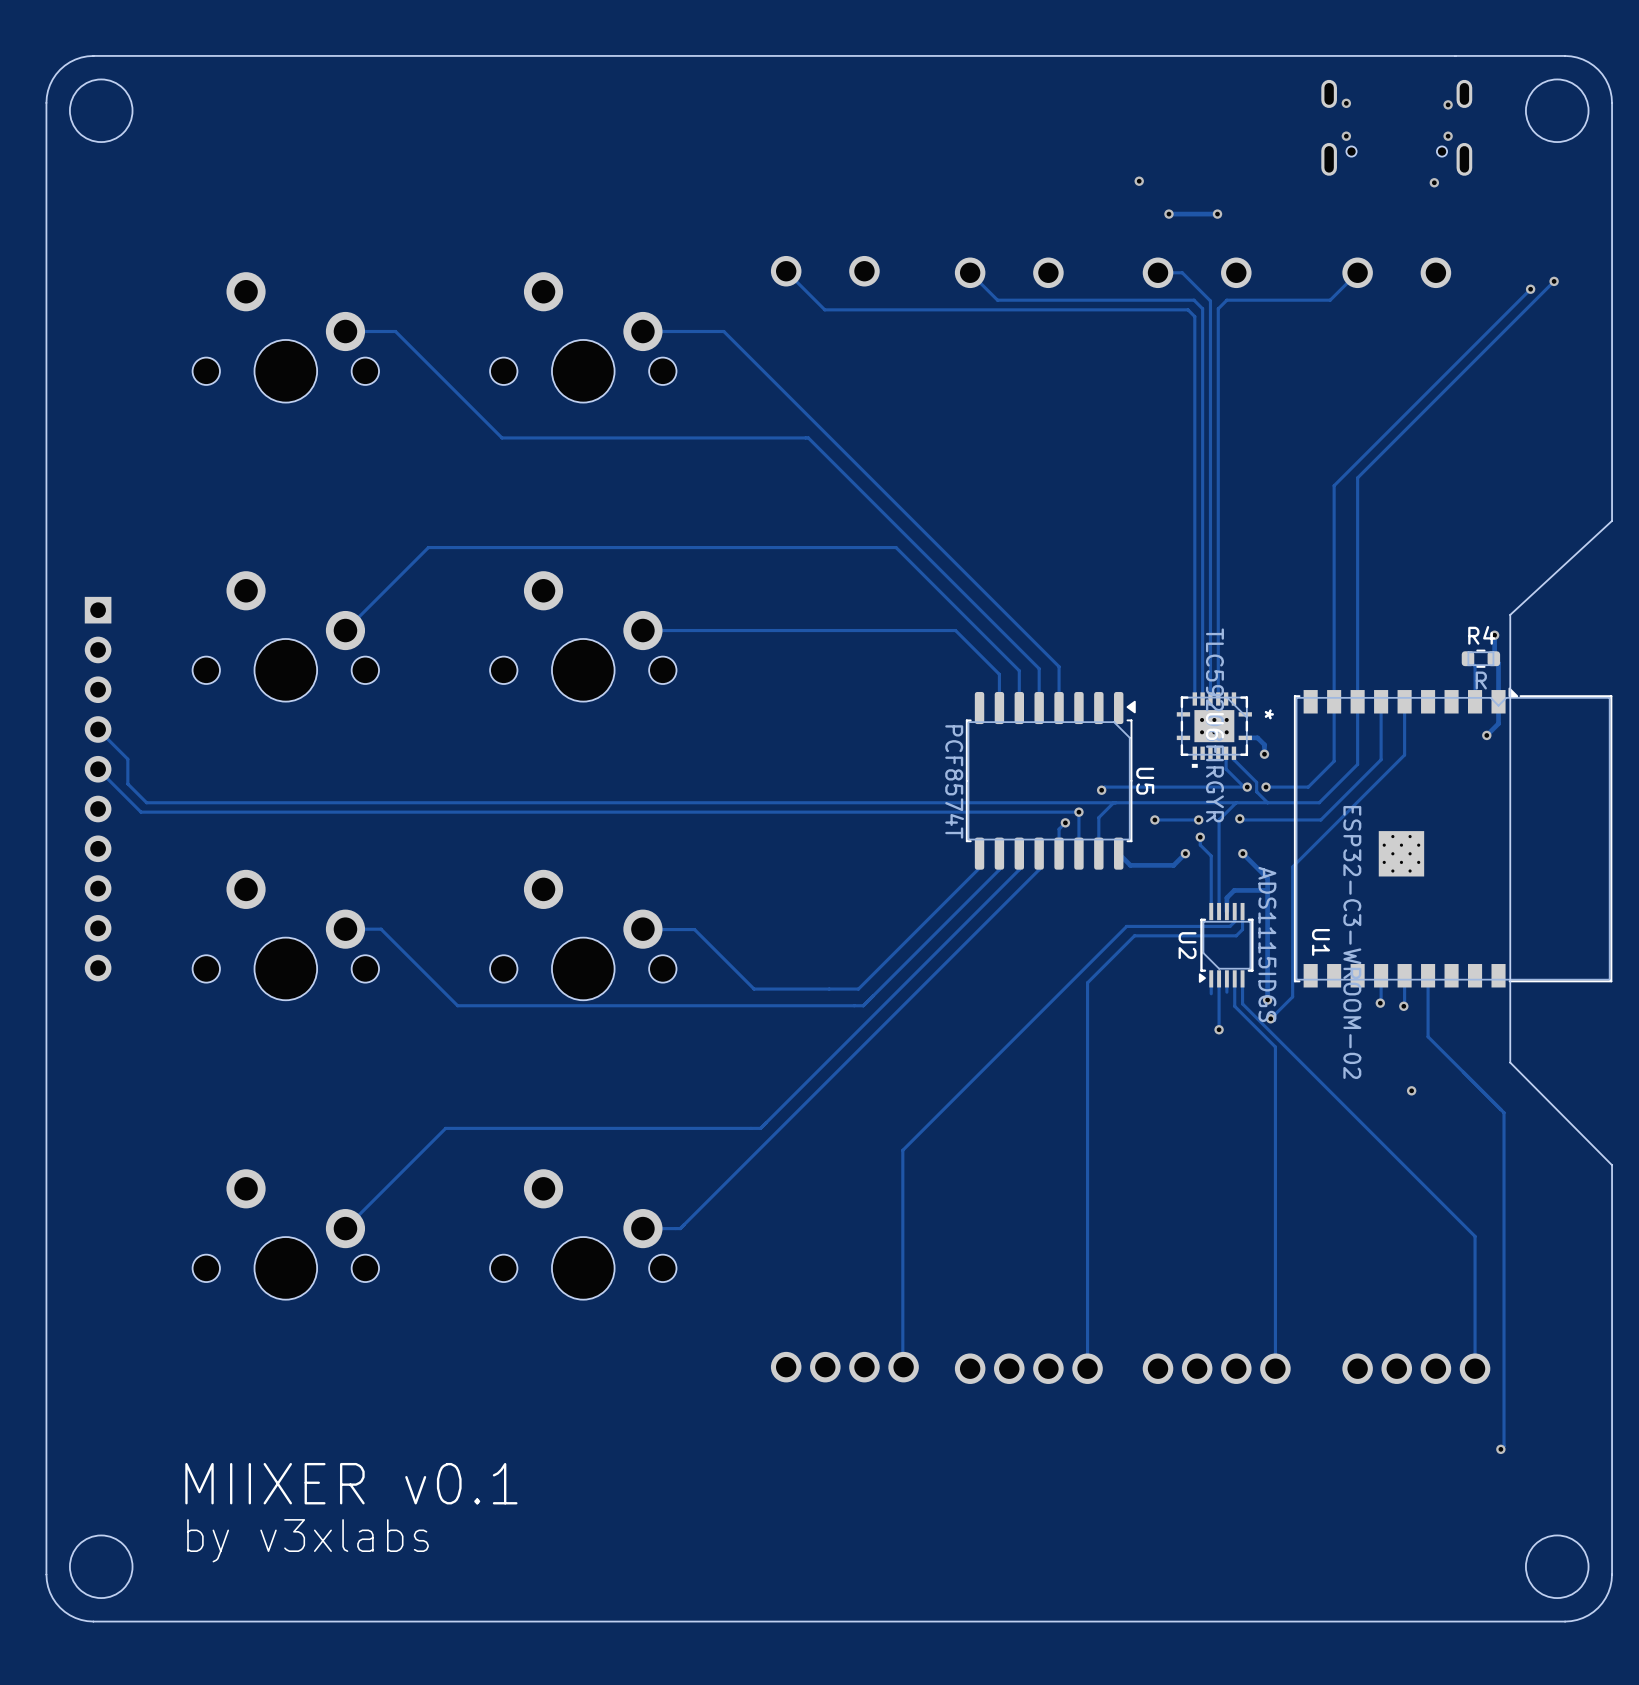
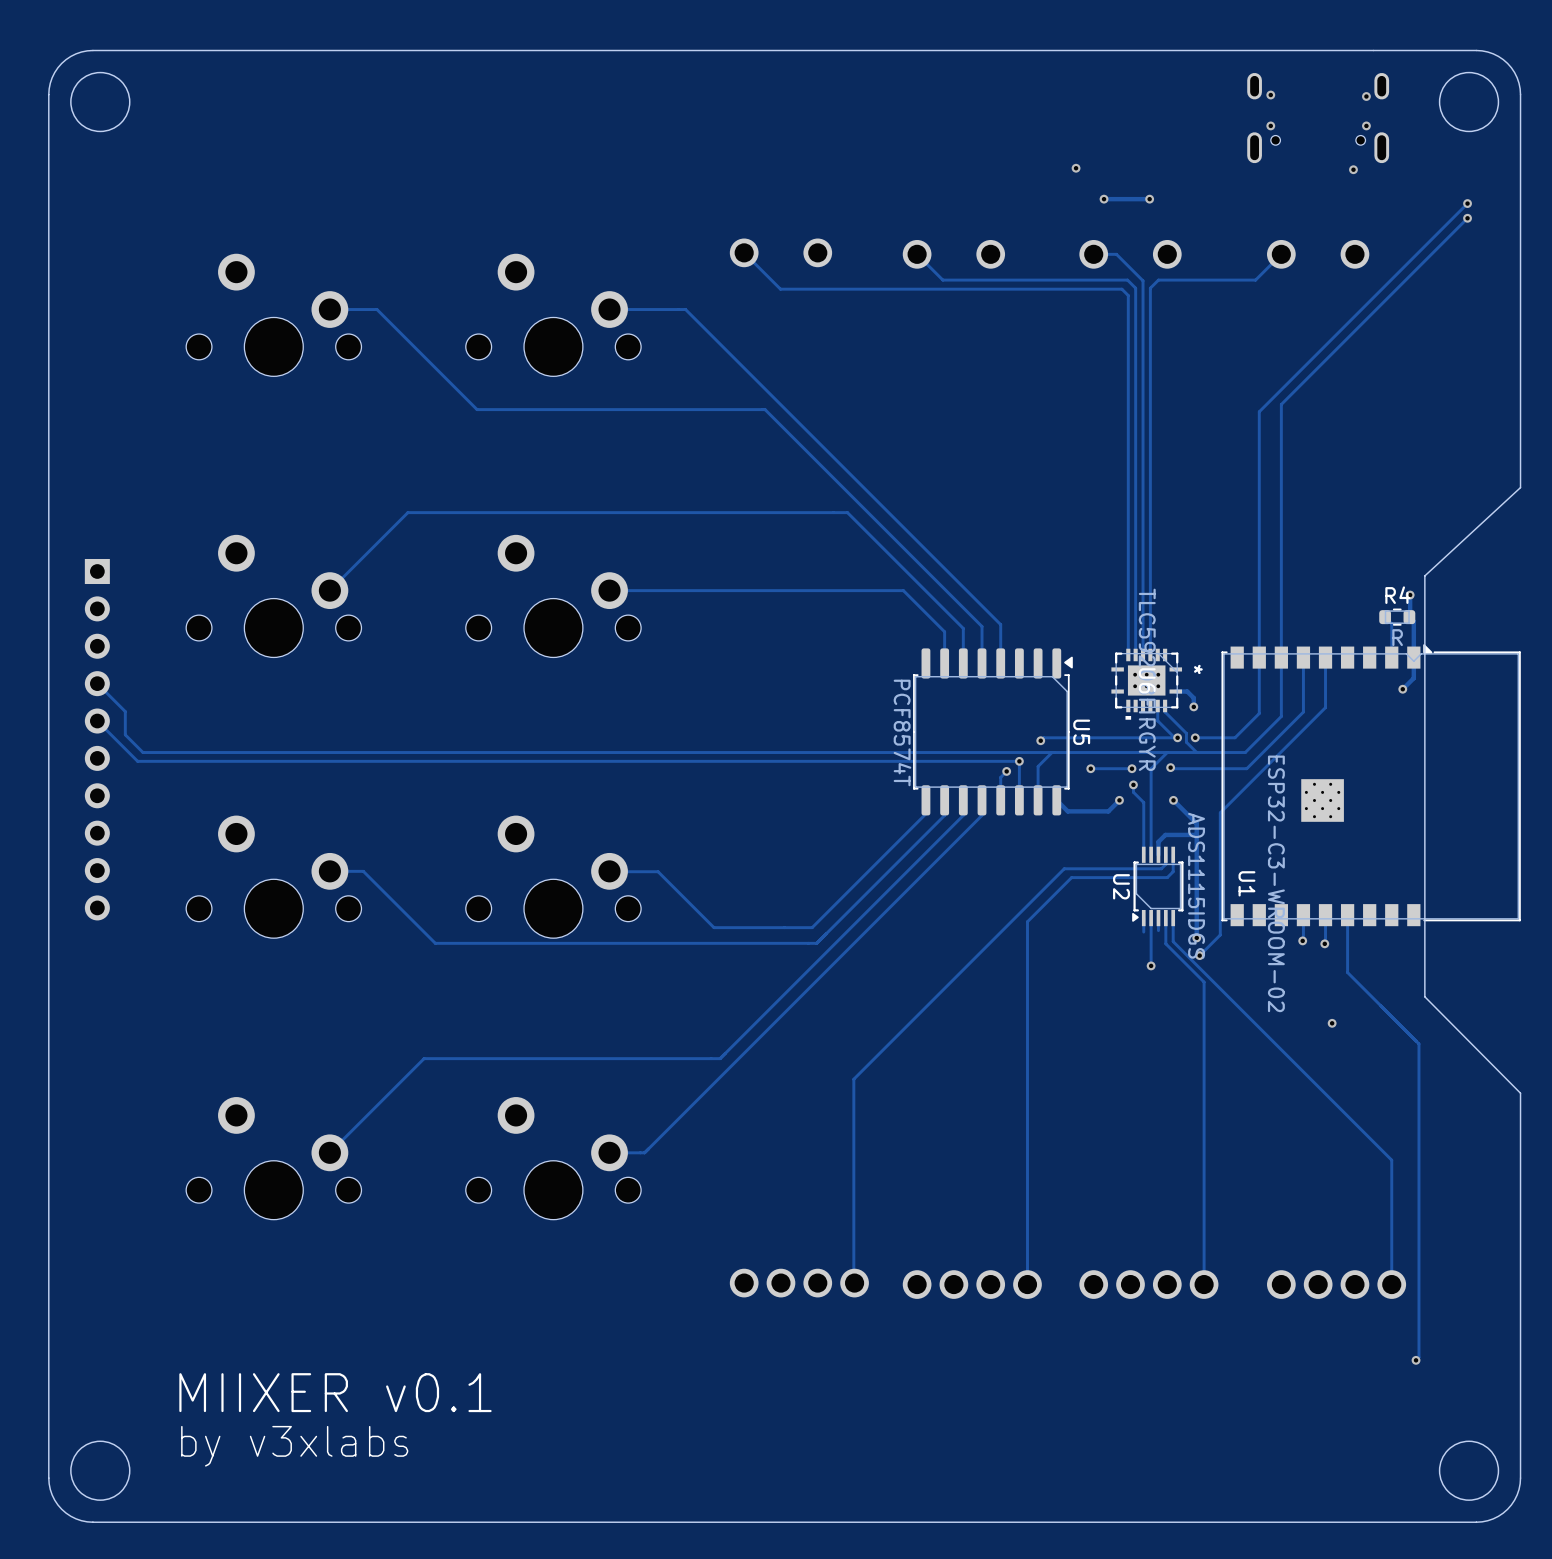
via: none -> (1467, 203)
via: none -> (1467, 218)
track: (1554, 281) (1357, 477) -> (1467, 218) (1281, 404) (1281, 447)
via: (1554, 281) -> none
track: (1530, 289) (1334, 485) -> (1467, 203) (1259, 411) (1259, 454)
via: (1530, 289) -> none

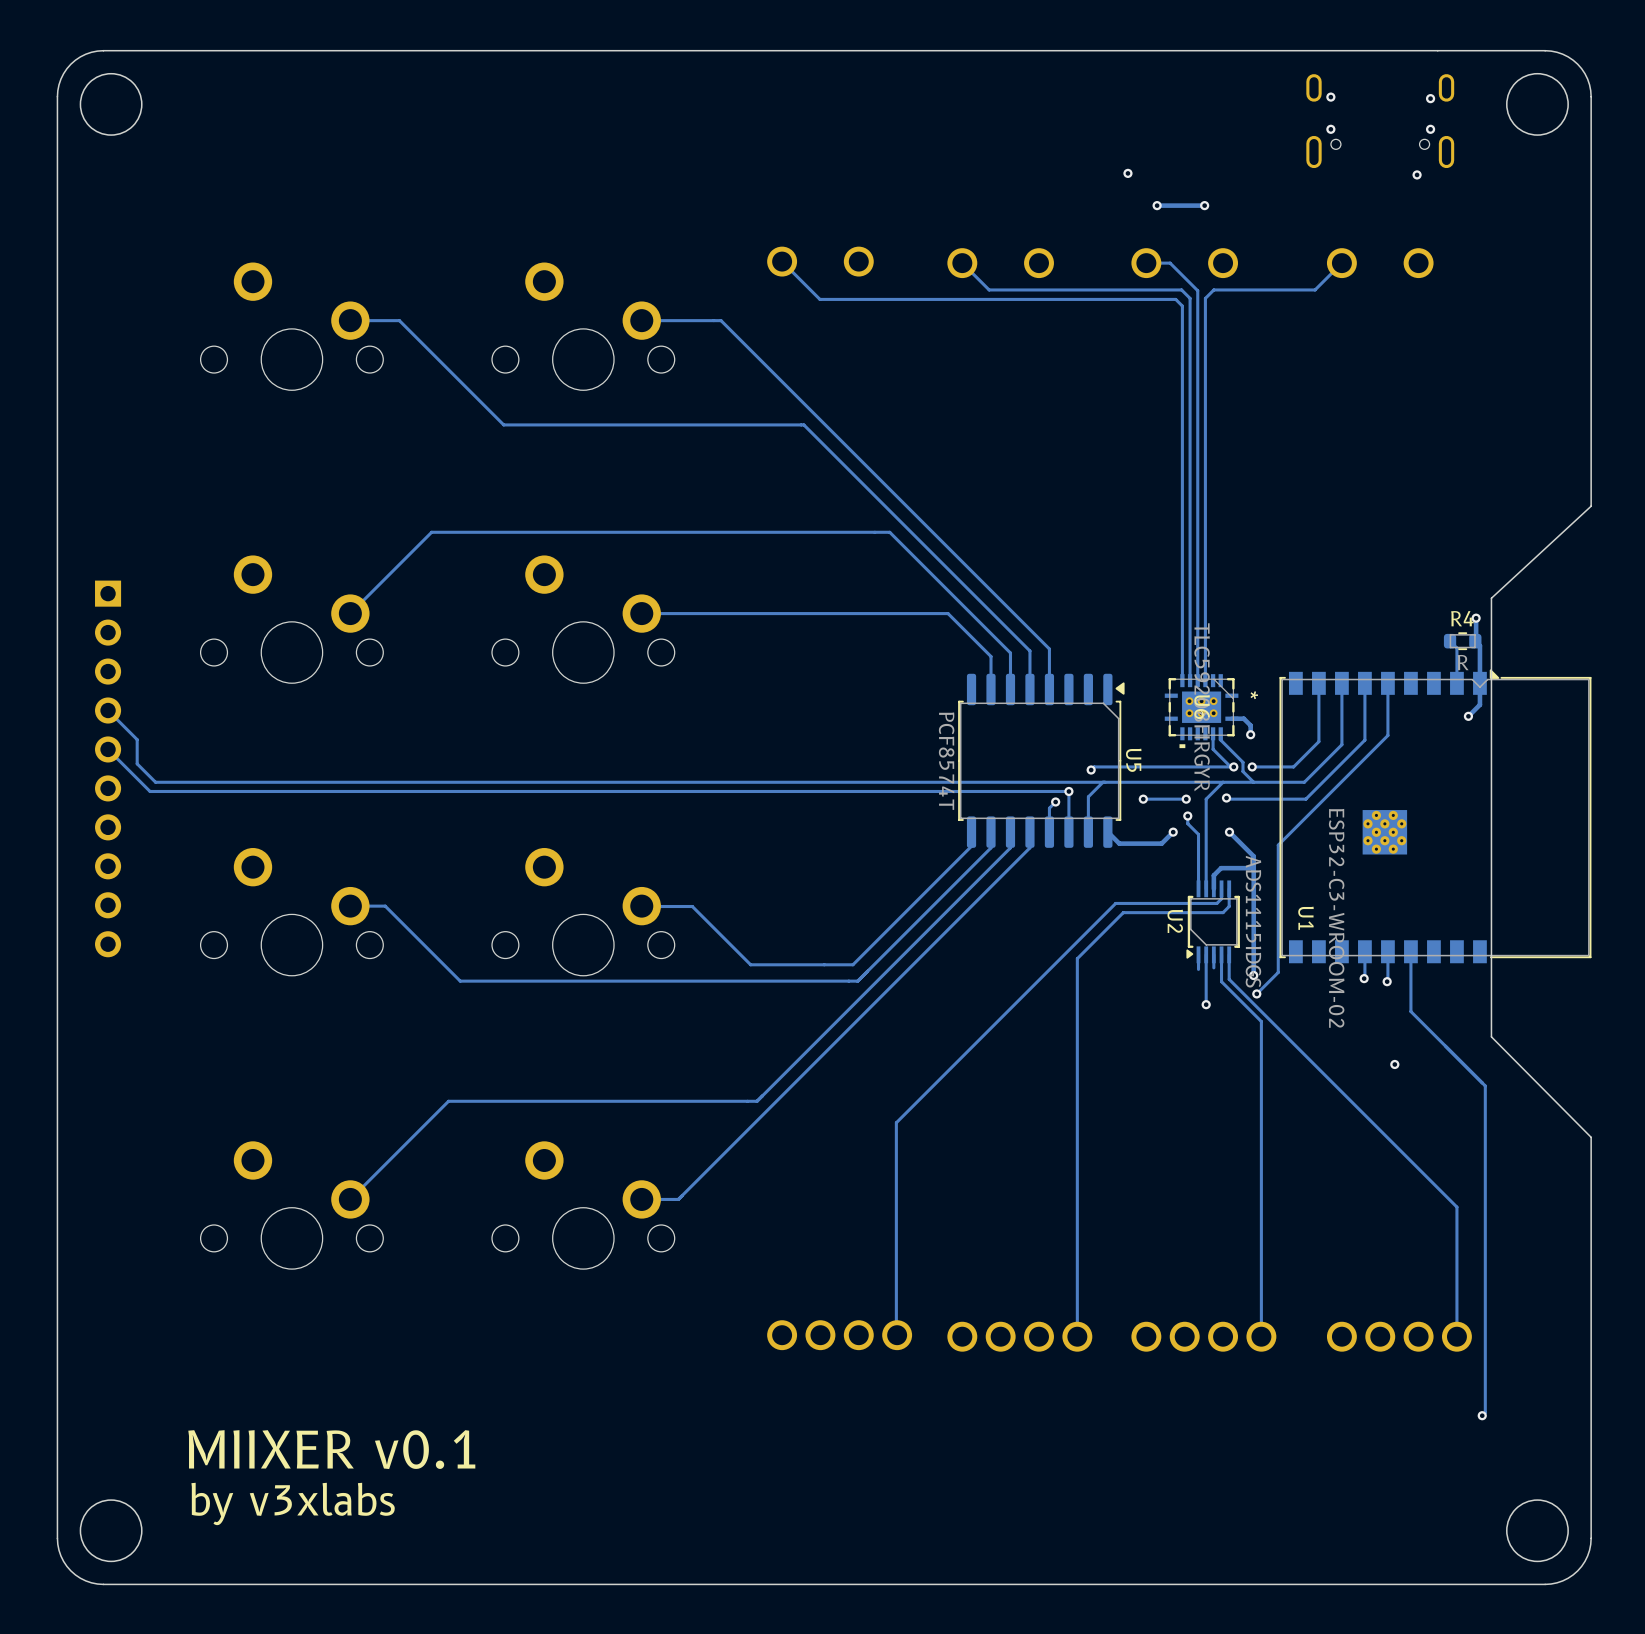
track: (1467, 203) (1259, 411) (1259, 657) -> none
via: (1467, 203) -> none
track: (1467, 218) (1281, 404) (1281, 657) -> none
via: (1467, 218) -> none

